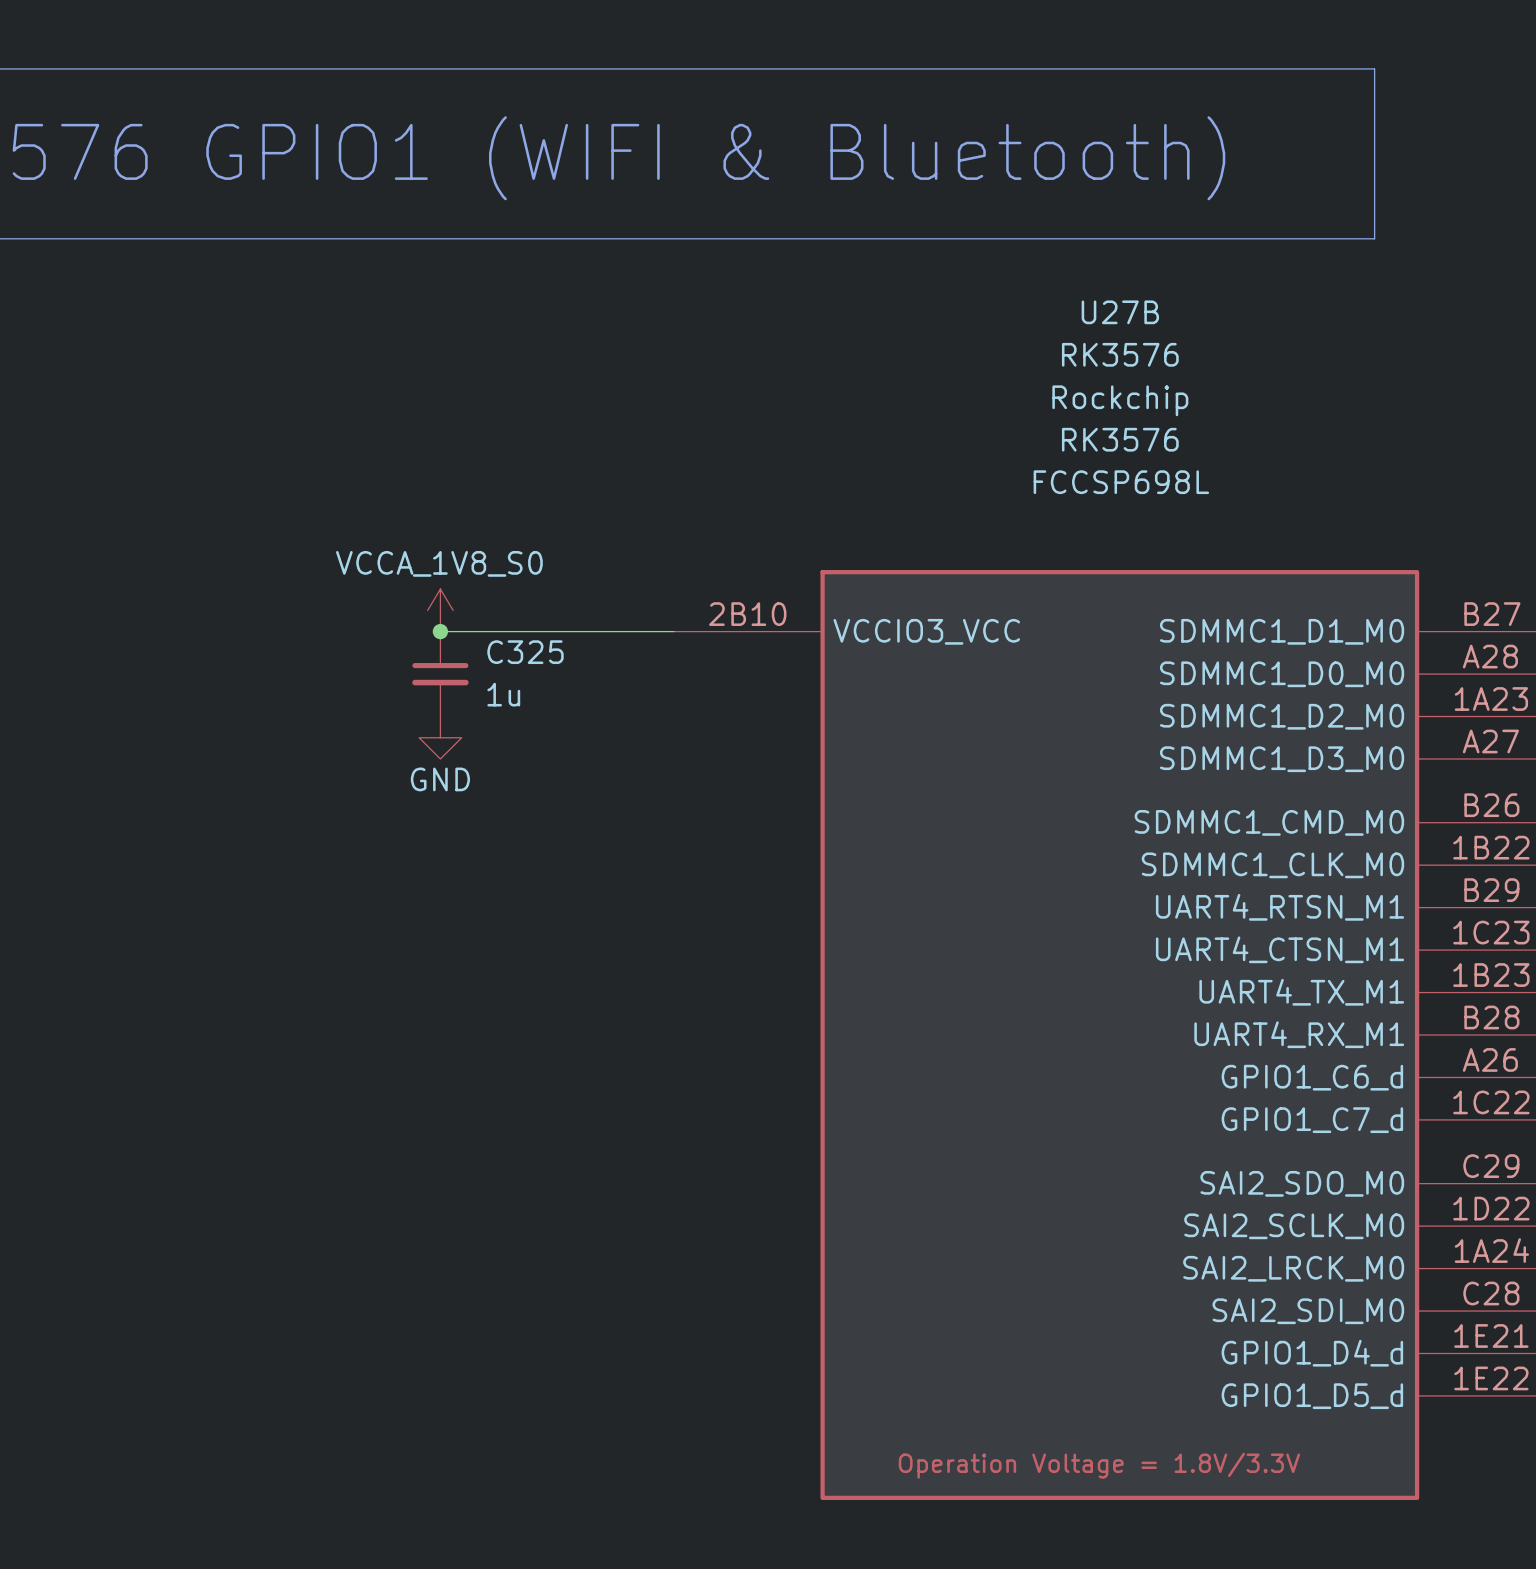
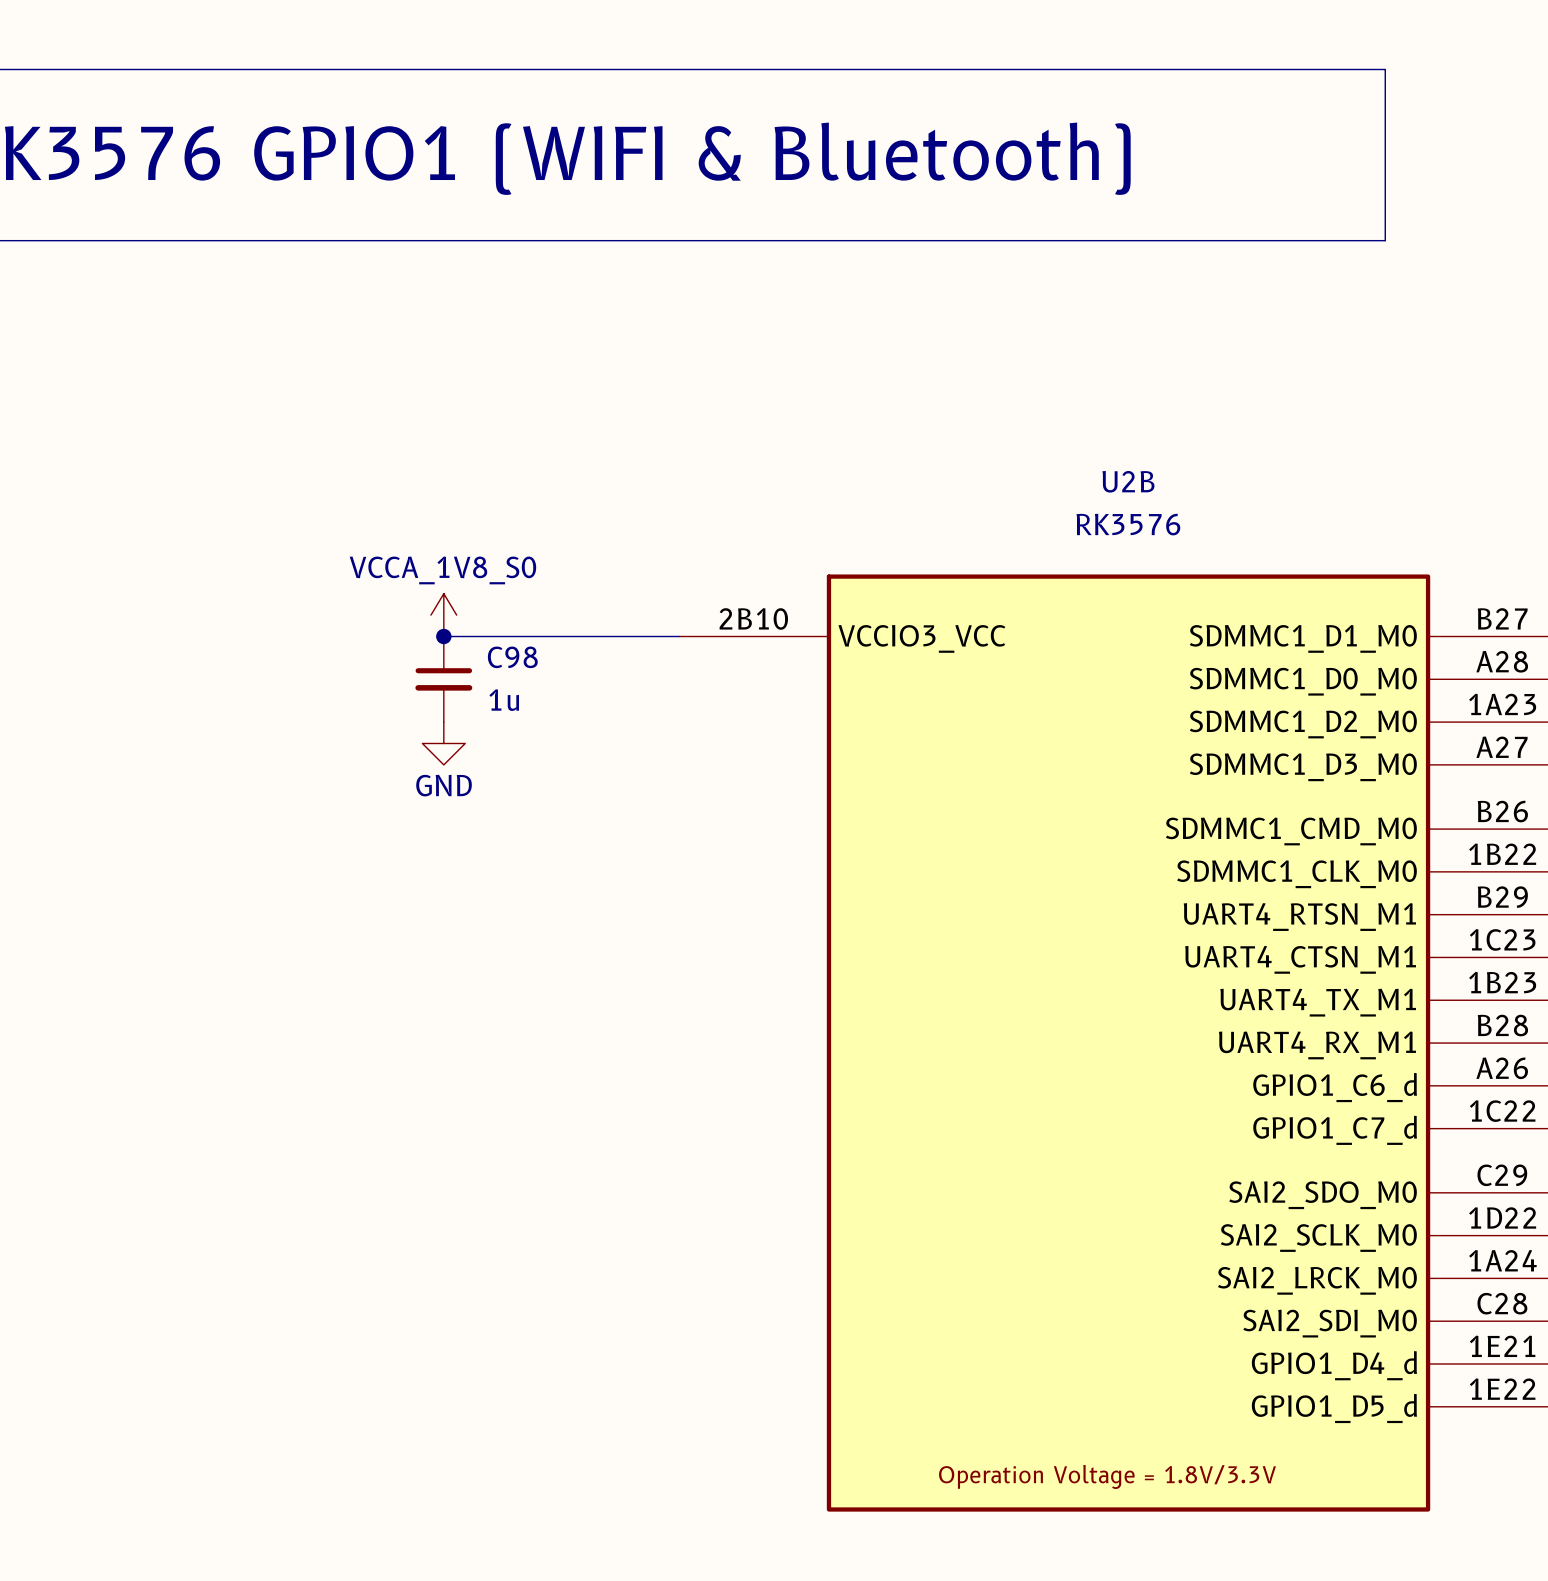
U27B name: U27B (1120, 312) -> U2B (1128, 481)
U27B value position: RK3576 (1120, 354) -> RK3576 (1128, 524)
U27B text: Rockchip (1120, 400) -> none
U27B text: RK3576 (1120, 439) -> none
U27B text: FCCSP698L (1121, 482) -> none
C325 name: C325 (525, 652) -> C98 (512, 657)

